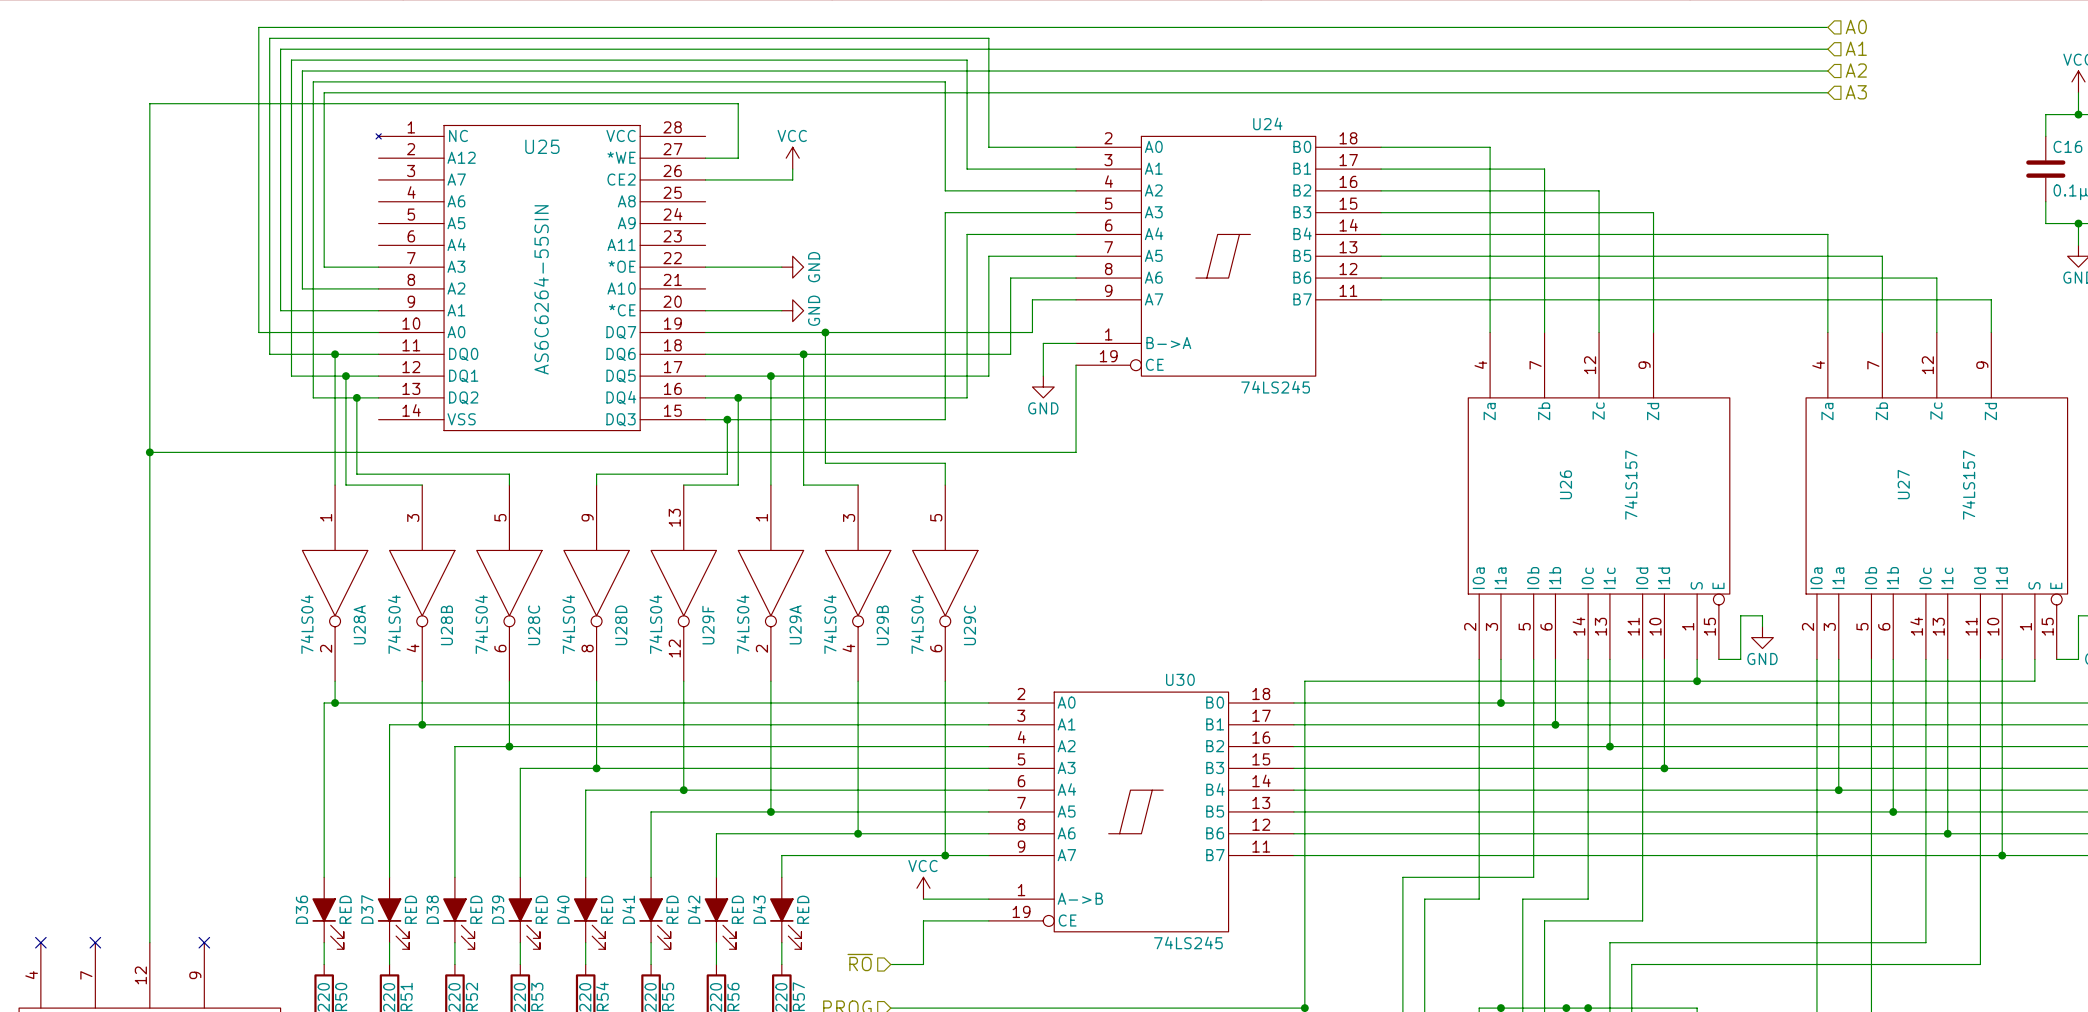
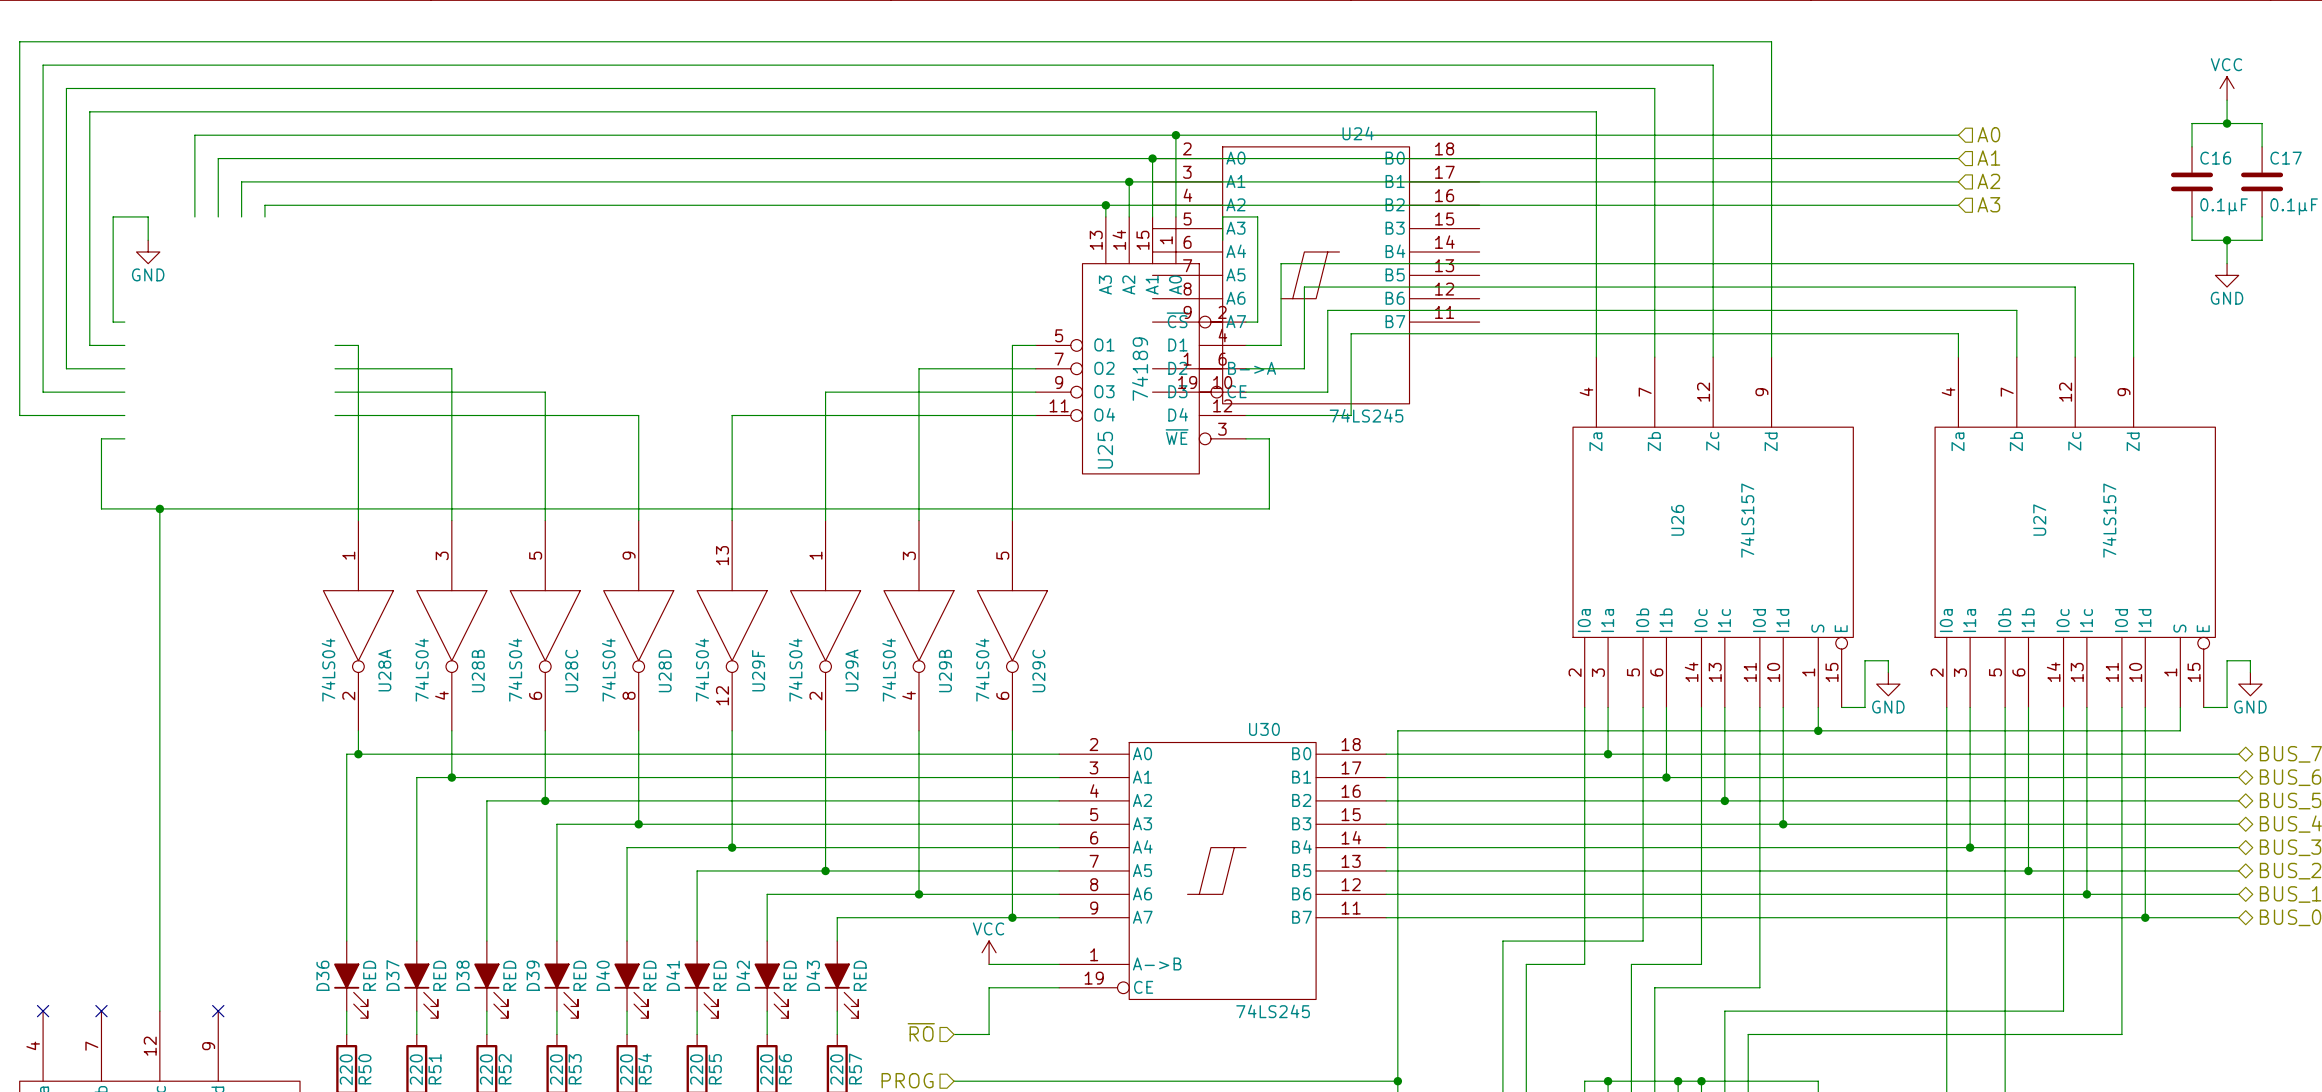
hierarchical label position: A0 (1856, 26) -> A0 (1988, 134)
wire: (1827, 27) (258, 27) (258, 332) (378, 332) -> none
wire: (269, 38) (269, 354) (378, 354) -> (288, 41) (19, 41) (19, 415) (124, 415)
wire: (988, 38) (988, 147) -> (218, 216) (218, 158) (1059, 158)
hierarchical label position: A1 (1856, 48) -> A1 (1988, 158)
wire: (1827, 49) (280, 49) (280, 310) (378, 310) -> none
wire: (291, 60) (291, 376) (378, 376) -> (311, 65) (43, 65) (43, 392) (124, 392)
wire: (967, 60) (967, 169) -> (241, 216) (241, 181) (1035, 181)
wire: none -> (1035, 65) (1713, 65) (1713, 205) (1958, 205)
hierarchical label position: A2 (1856, 70) -> A2 (1988, 181)
wire: (1827, 71) (302, 71) (302, 288) (378, 288) -> none
wire: (313, 81) (313, 397) (378, 397) -> (335, 88) (66, 88) (66, 368) (124, 368)
wire: (945, 81) (945, 190) -> (264, 216) (264, 205) (1012, 205)
wire: none -> (1012, 88) (1654, 88) (1654, 181) (1958, 181)
wire: (1827, 92) (324, 92) (324, 267) (378, 267) -> none
hierarchical label position: A3 (1856, 92) -> A3 (1988, 204)
wire: (149, 103) (149, 474) -> (159, 111) (89, 111) (89, 345) (124, 345)
wire: (738, 103) (738, 158) (705, 158) -> (790, 111) (1596, 111) (1596, 158) (1958, 158)
U25 symbol: [376, 124, 706, 432] -> [1035, 216, 1247, 474]
wire: none -> (1175, 135) (1175, 216)
junction: none -> (1175, 135)
wire: none -> (1958, 135) (194, 135) (194, 216)
U25 name position: U25 (542, 146) -> U25 (1105, 450)
junction: none -> (1152, 158)
wire: none -> (1479, 158) (1152, 158) (1152, 216)
power symbol: VCC (792, 158) -> none
wire: (792, 169) (792, 179) (705, 179) -> none
wire: none -> (1129, 181) (1129, 216)
junction: none -> (1129, 181)
wire: none -> (1152, 181) (1479, 181)
wire: none -> (1105, 205) (1105, 216)
junction: none -> (1105, 205)
wire: none -> (1152, 205) (1479, 205)
wire: (1076, 212) (945, 212) (945, 321) -> (1035, 345) (1012, 345)
wire: (1381, 212) (1653, 212) -> (1059, 41) (1771, 41) (1771, 228)
wire: none -> (148, 240) (148, 216) (113, 216) (113, 322) (124, 322)
wire: none -> (1222, 240) (1222, 216) (1257, 216) (1257, 322) (1246, 322)
power symbol: none -> GND (148, 251)
wire: (1076, 234) (967, 234) (967, 397) (705, 397) -> none
wire: (1381, 234) (1827, 234) (1827, 310) -> (1246, 415) (1351, 415) (1351, 333) (1958, 333)
wire: (1076, 256) (988, 256) (988, 376) (705, 376) -> none
wire: (1381, 256) (1882, 256) (1882, 288) -> (1246, 392) (1327, 392) (1327, 310) (2016, 310)
wire: (705, 267) (781, 267) -> none
power symbol: GND (792, 267) -> none
wire: (1076, 278) (1010, 278) (1010, 354) (705, 354) -> none
wire: (1381, 278) (1936, 278) -> (1246, 368) (1304, 368) (1304, 287) (2075, 287) (2075, 298)
U25 value: AS6C6264-55SIN (541, 289) -> 74189 (1140, 369)
wire: (1076, 299) (1032, 299) (1032, 332) (705, 332) -> none
wire: (1381, 299) (1991, 299) -> (1246, 345) (1281, 345) (1281, 263) (2133, 263) (2133, 322)
wire: (705, 310) (781, 310) -> none
power symbol: GND (792, 310) -> none
wire: none -> (335, 345) (358, 345) (358, 380)
wire: (825, 332) (825, 463) (945, 463) -> (1012, 450) (1012, 497)
junction: (825, 332) -> none
wire: (1076, 343) (1043, 343) (1043, 376) -> none
junction: (335, 354) -> none
wire: (803, 354) (803, 485) (858, 485) -> (1035, 368) (918, 368) (918, 520)
junction: (803, 354) -> none
wire: none -> (335, 392) (545, 392) (545, 508) (638, 508) (638, 415) (335, 415)
wire: none -> (1035, 392) (825, 392) (825, 403)
wire: (1076, 365) (1076, 452) (149, 452) -> none
wire: (345, 376) (345, 485) (422, 485) -> (335, 368) (451, 368) (451, 520)
junction: (345, 376) -> none
junction: (770, 376) -> none
power symbol: GND (1043, 387) -> none
wire: (356, 397) (356, 474) -> (124, 438) (101, 438) (101, 508) (381, 508)
junction: (356, 397) -> none
wire: (738, 397) (738, 485) (683, 485) -> (1035, 415) (732, 415) (732, 520)
junction: (738, 397) -> none
wire: (705, 419) (945, 419) -> none
wire: (727, 419) (727, 474) -> (1246, 438) (1269, 438) (1269, 508) (778, 508)
junction: (727, 419) -> none
junction position: (149, 452) -> (159, 508)

